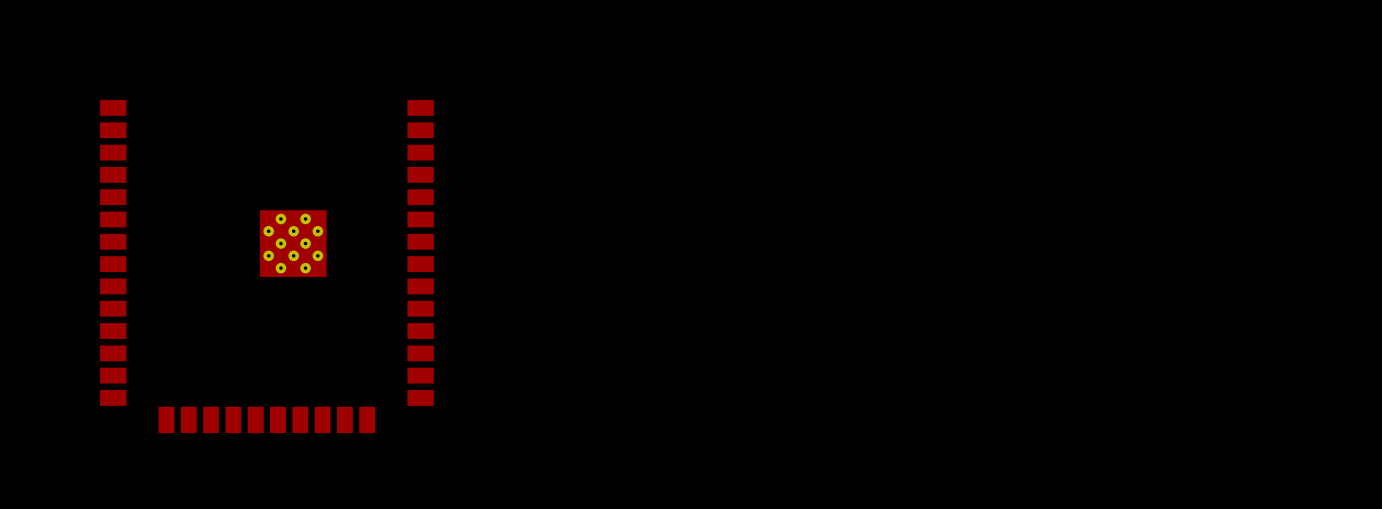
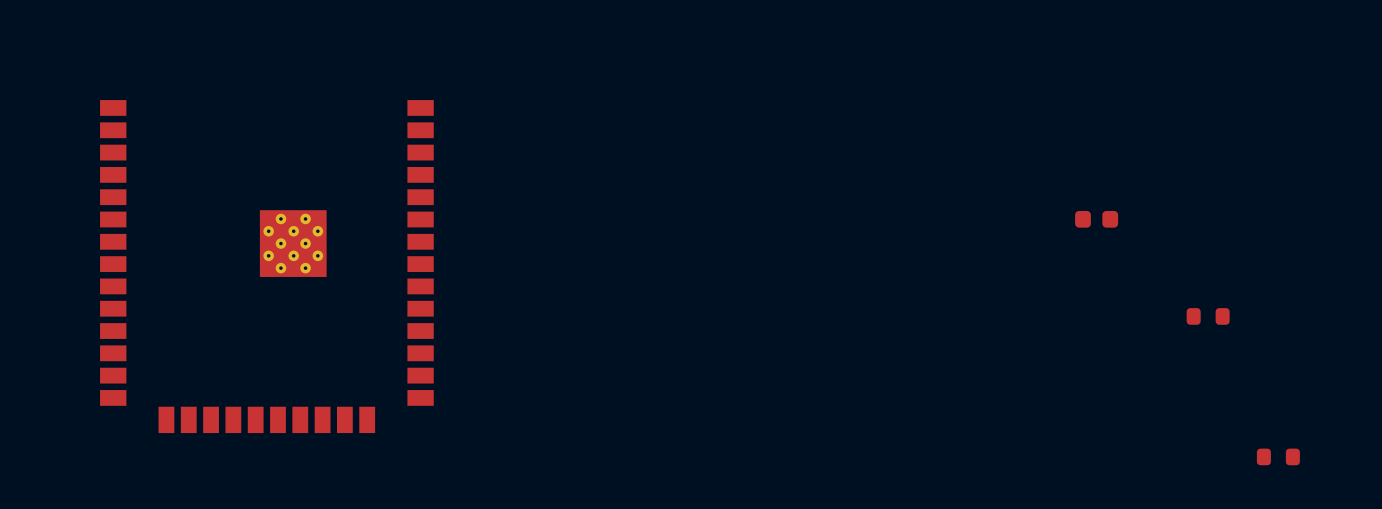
part: none -> (1096, 219)
part: none -> (1208, 316)
part: none -> (1278, 456)

